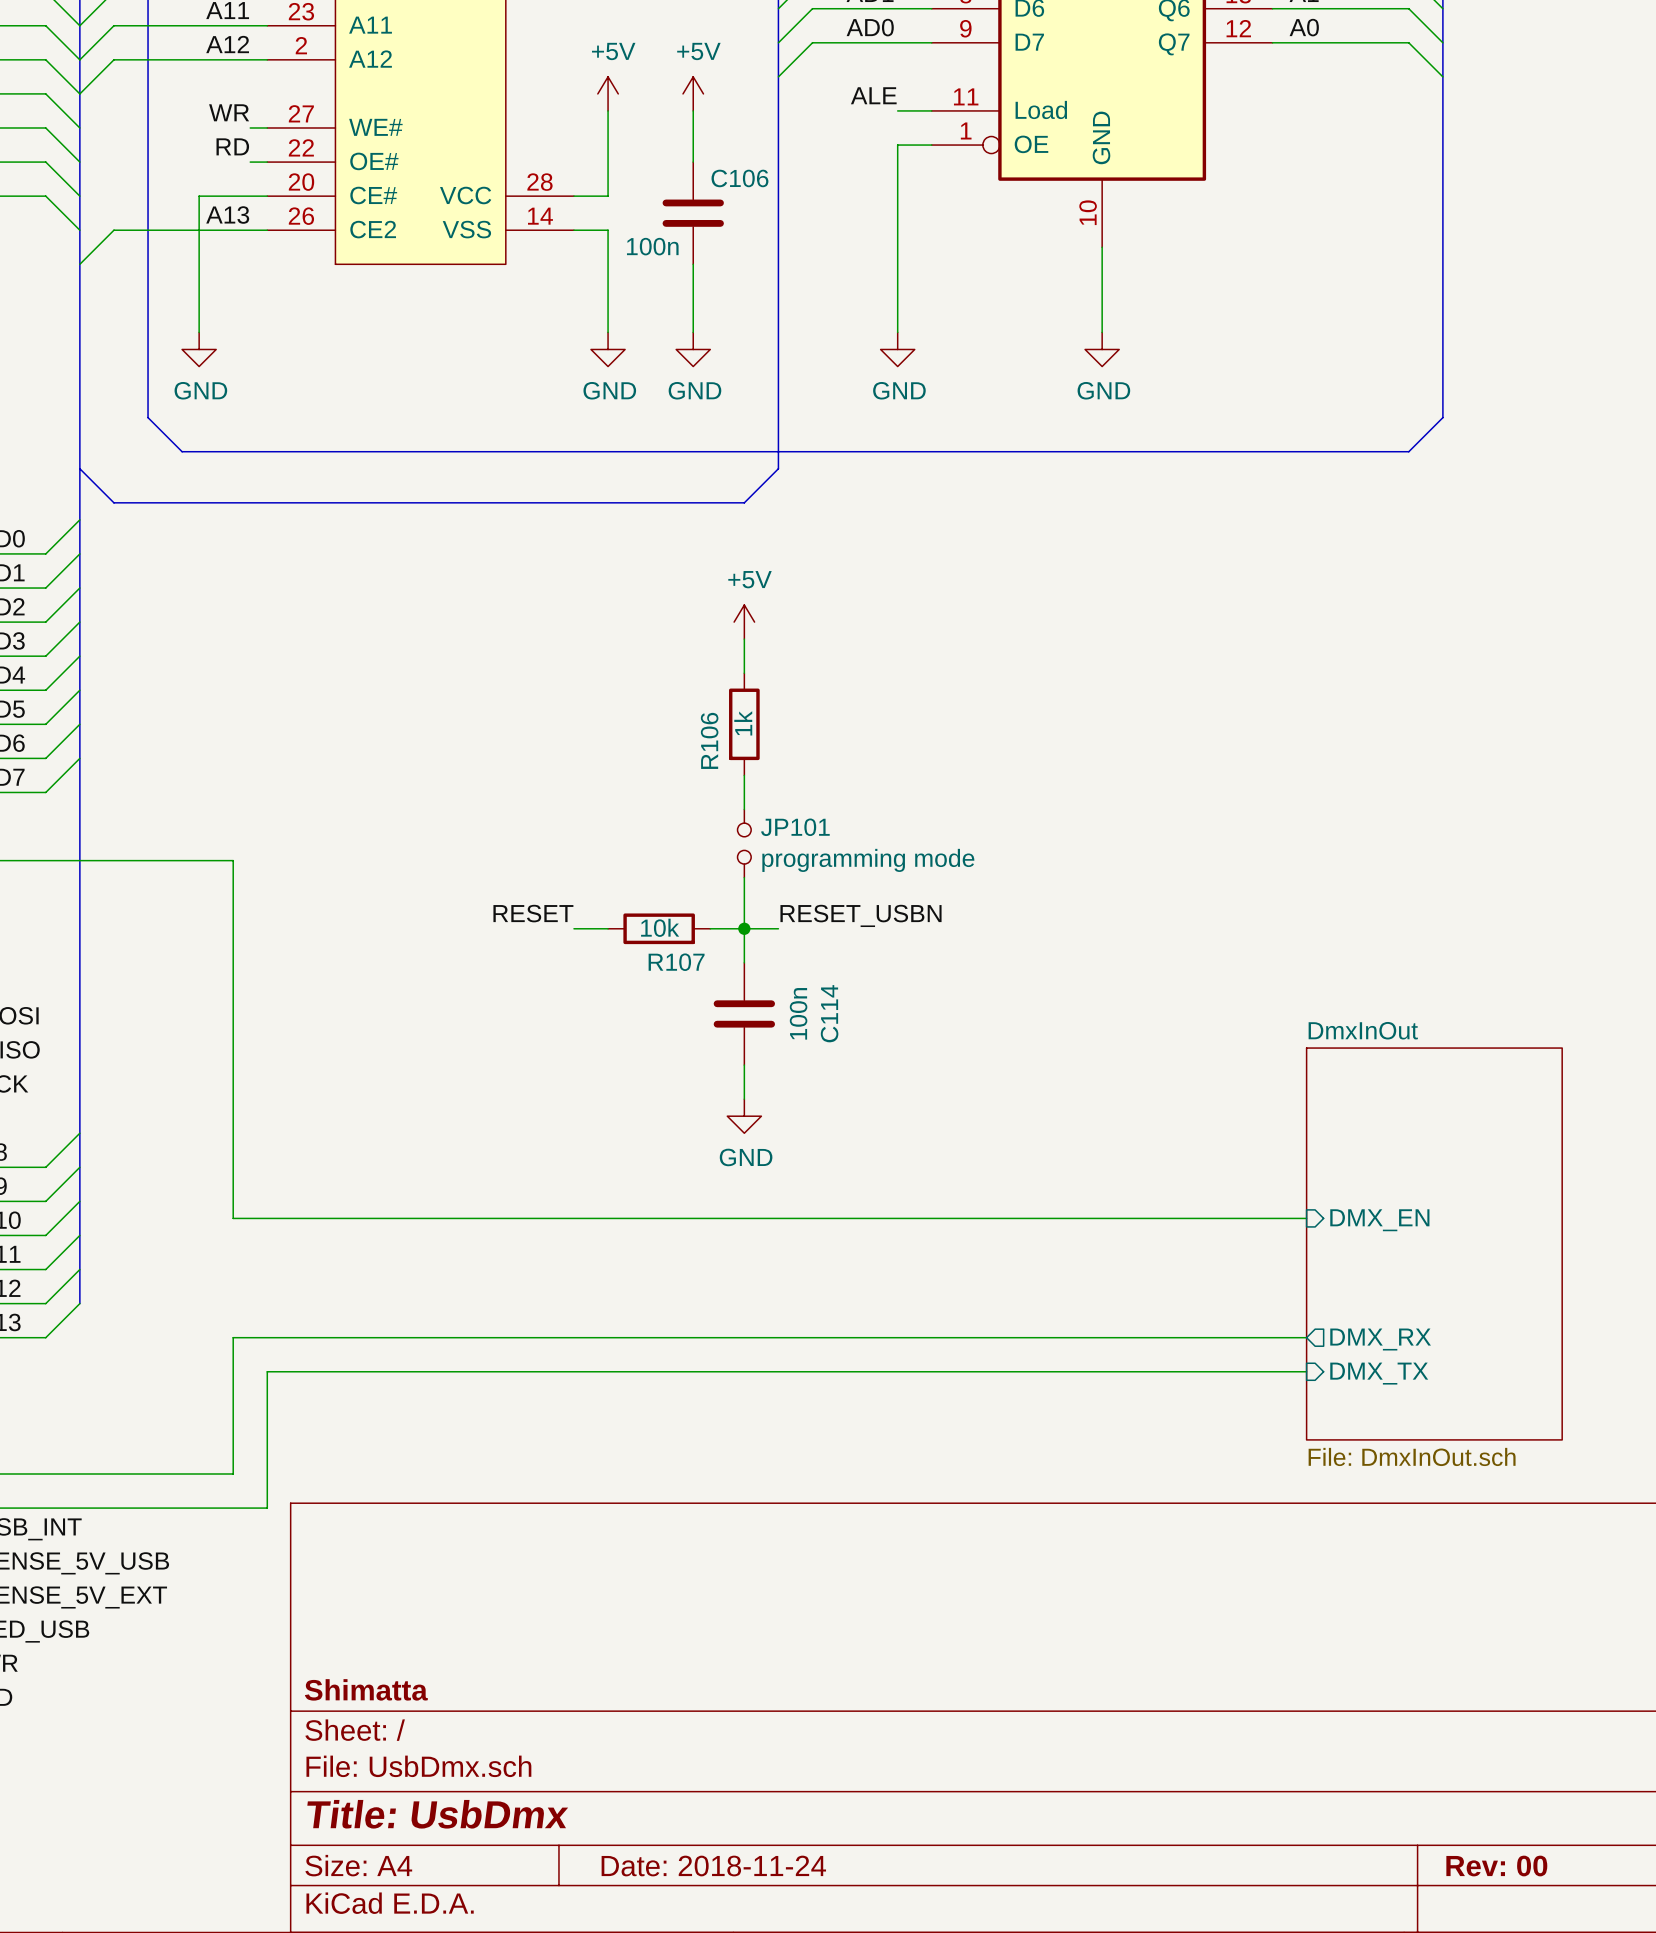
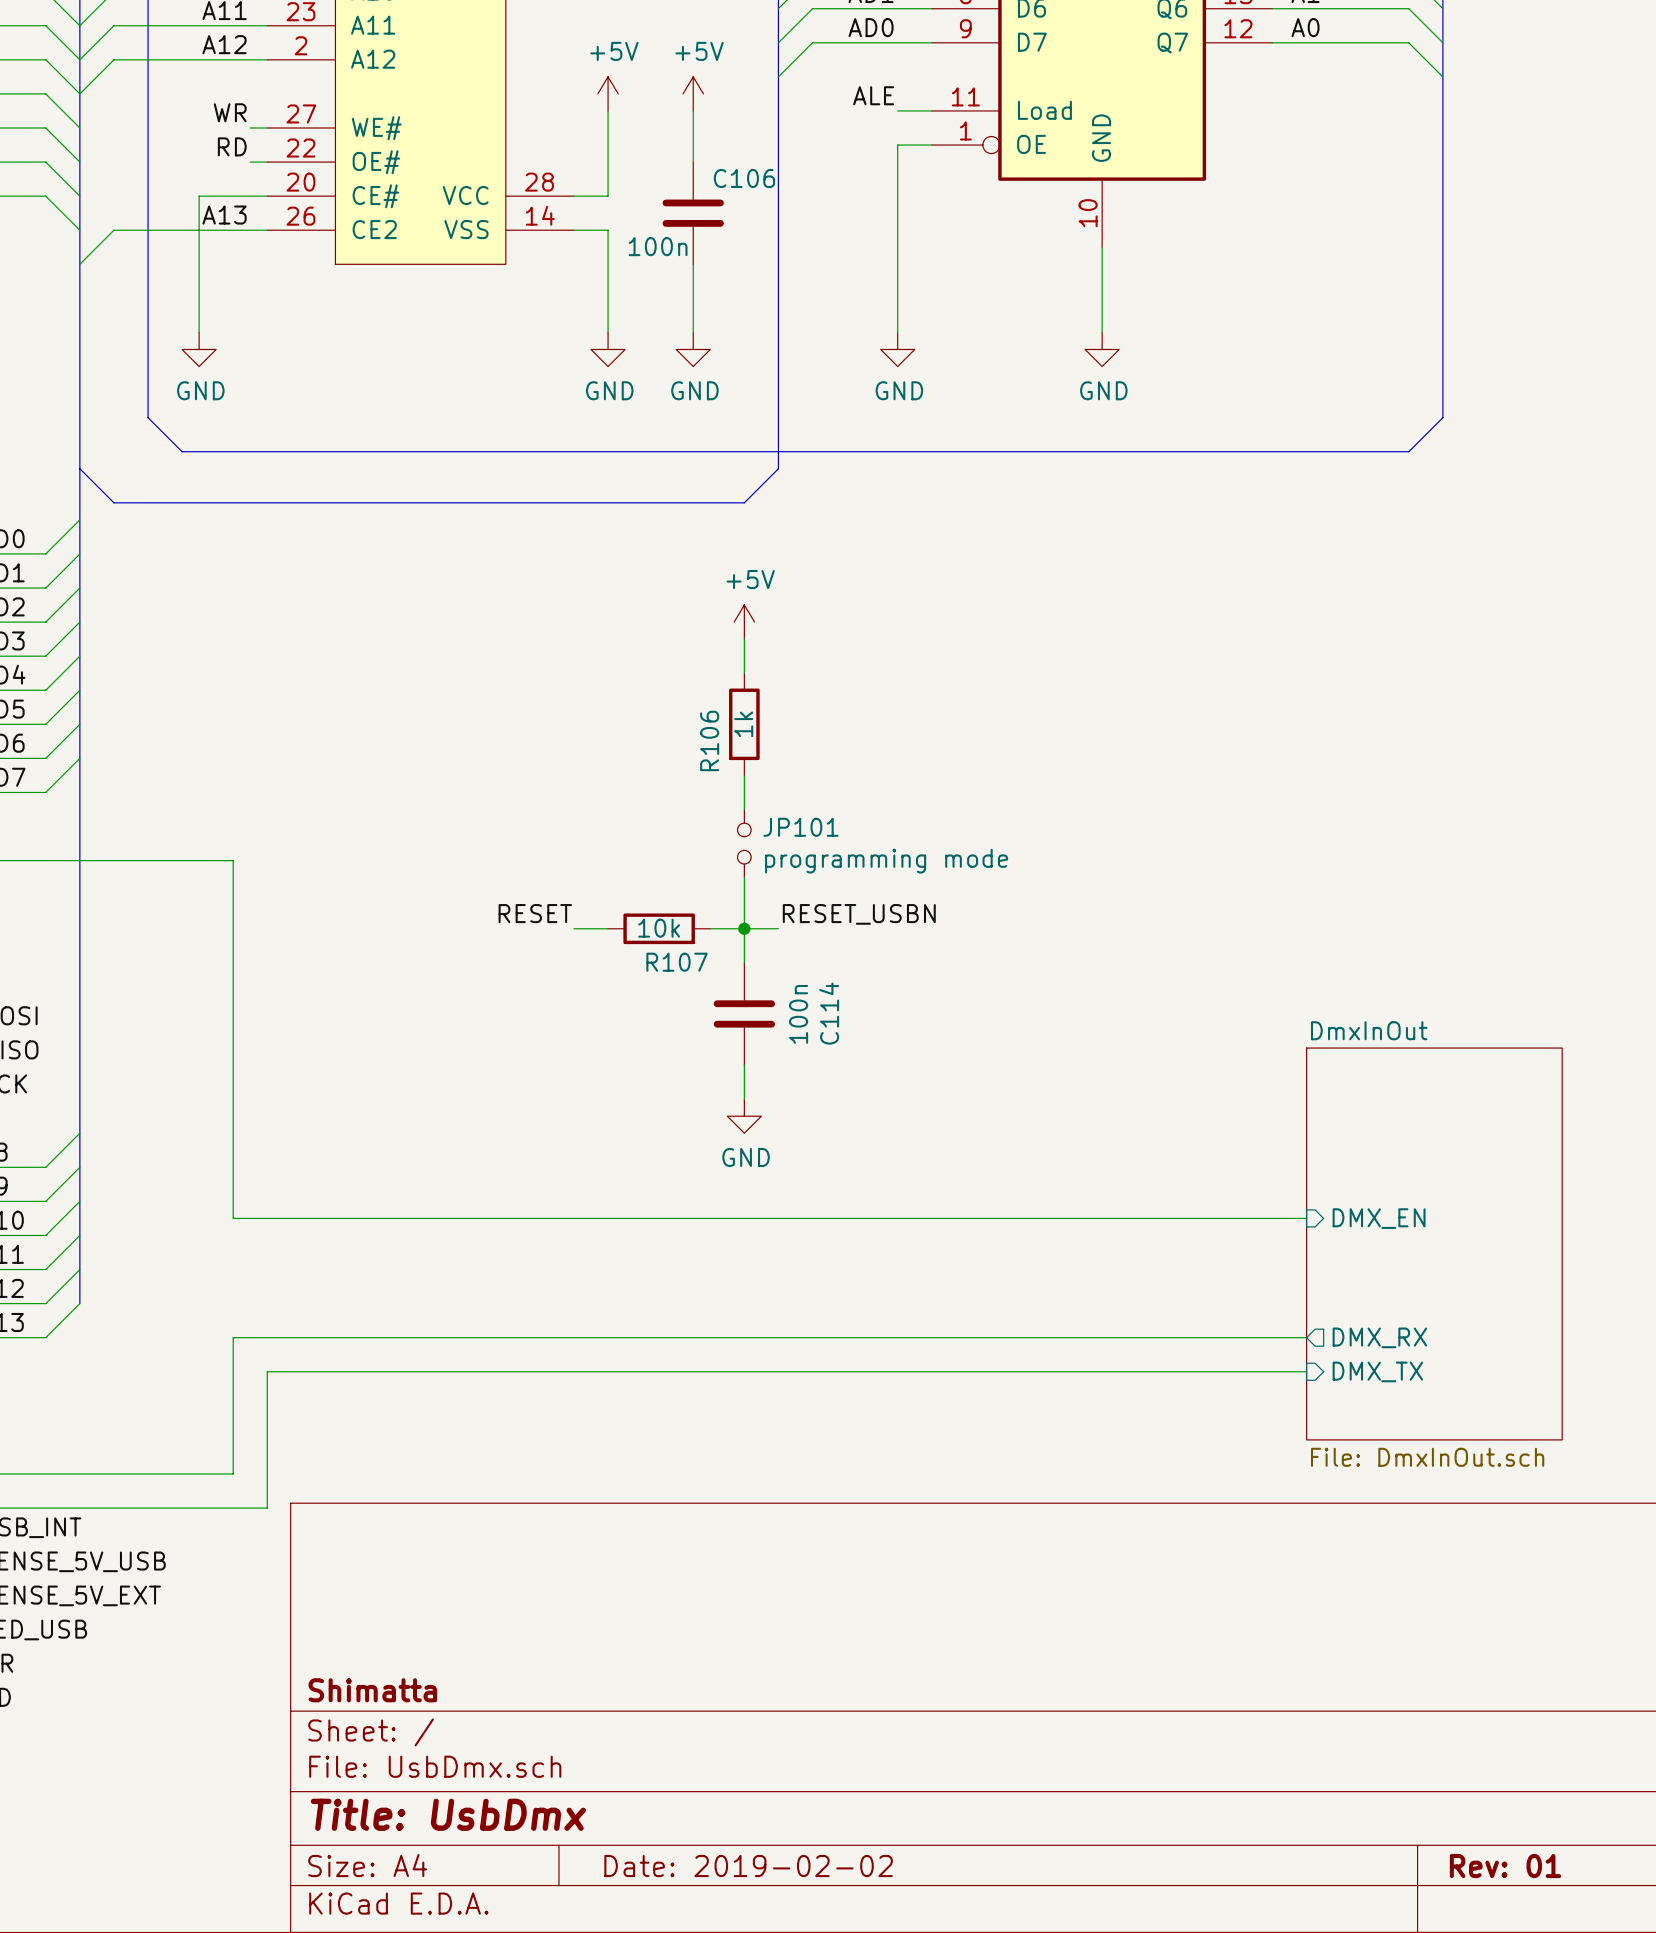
title block: Date: 2018-11-24 (713, 1866) -> Date: 2019-02-02 (748, 1866)
title block: Rev: 00 (1496, 1866) -> Rev: 01 (1505, 1866)

